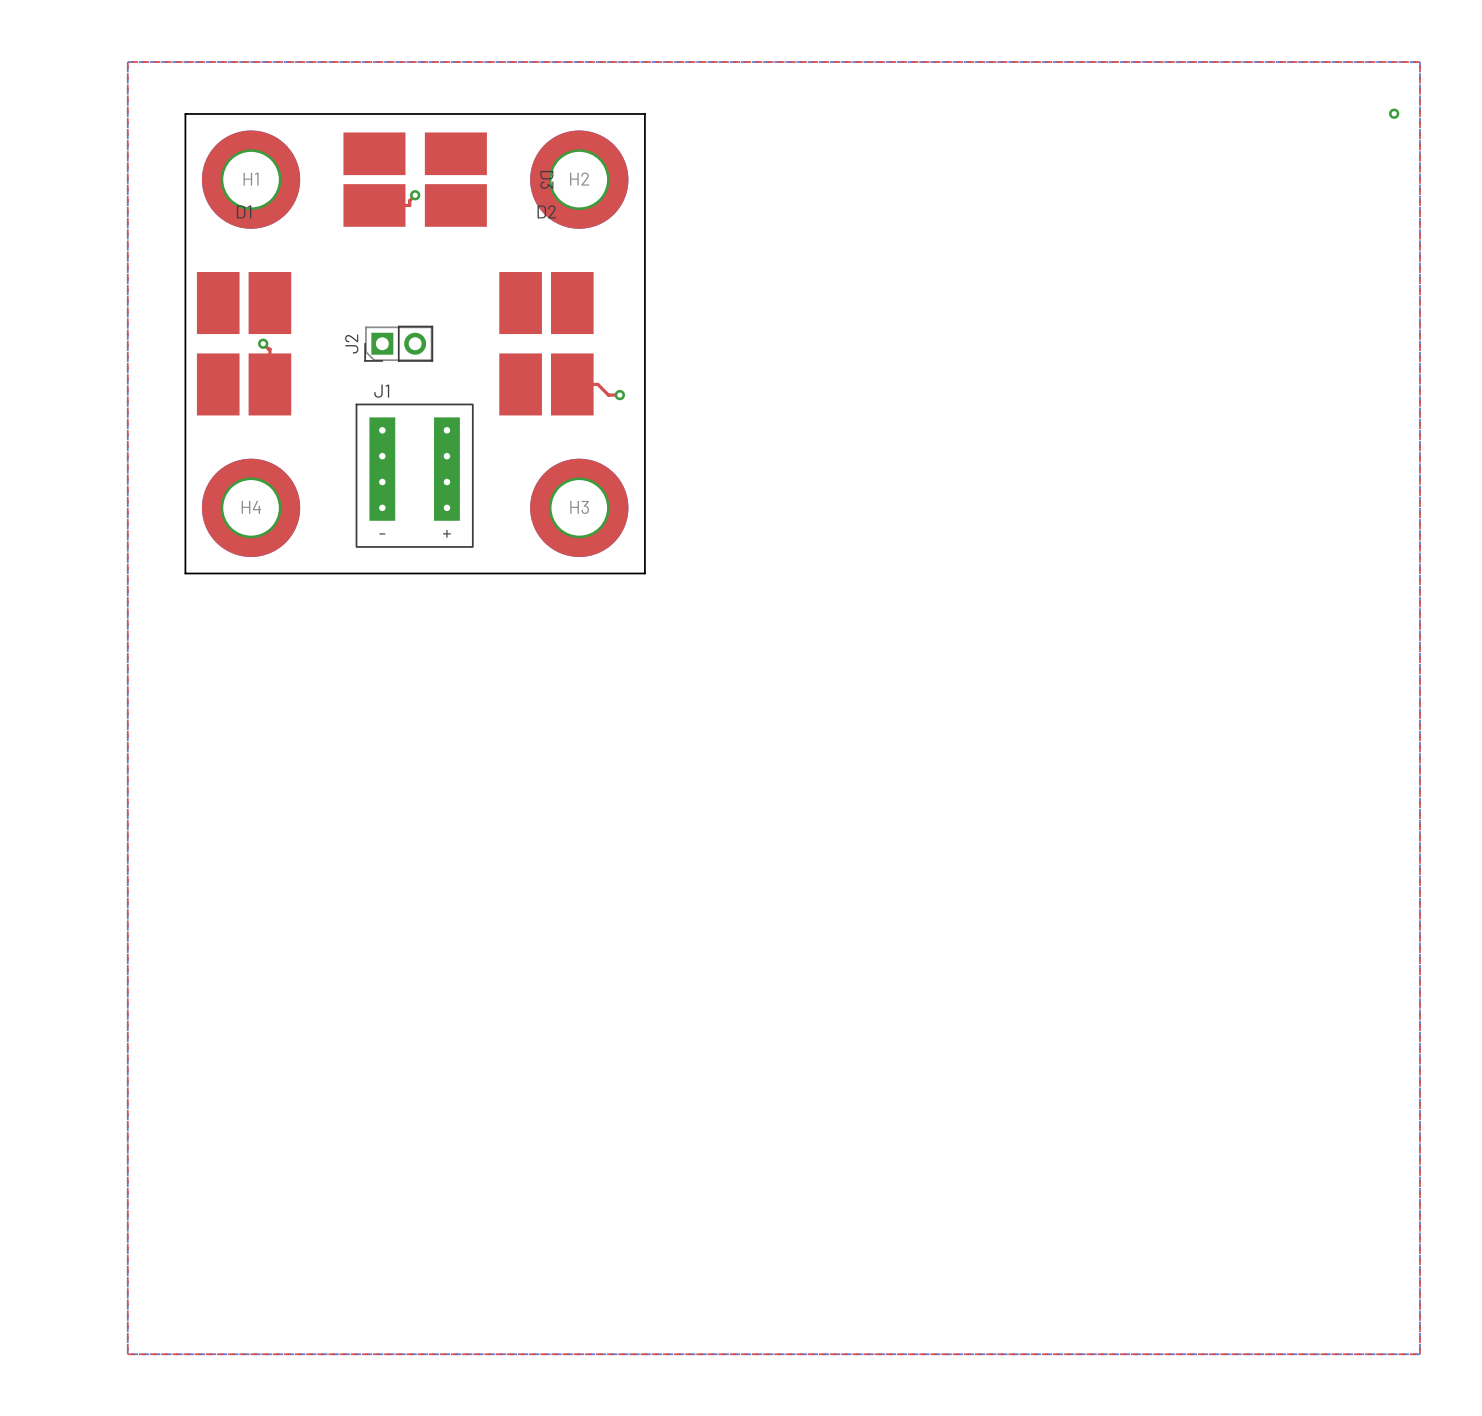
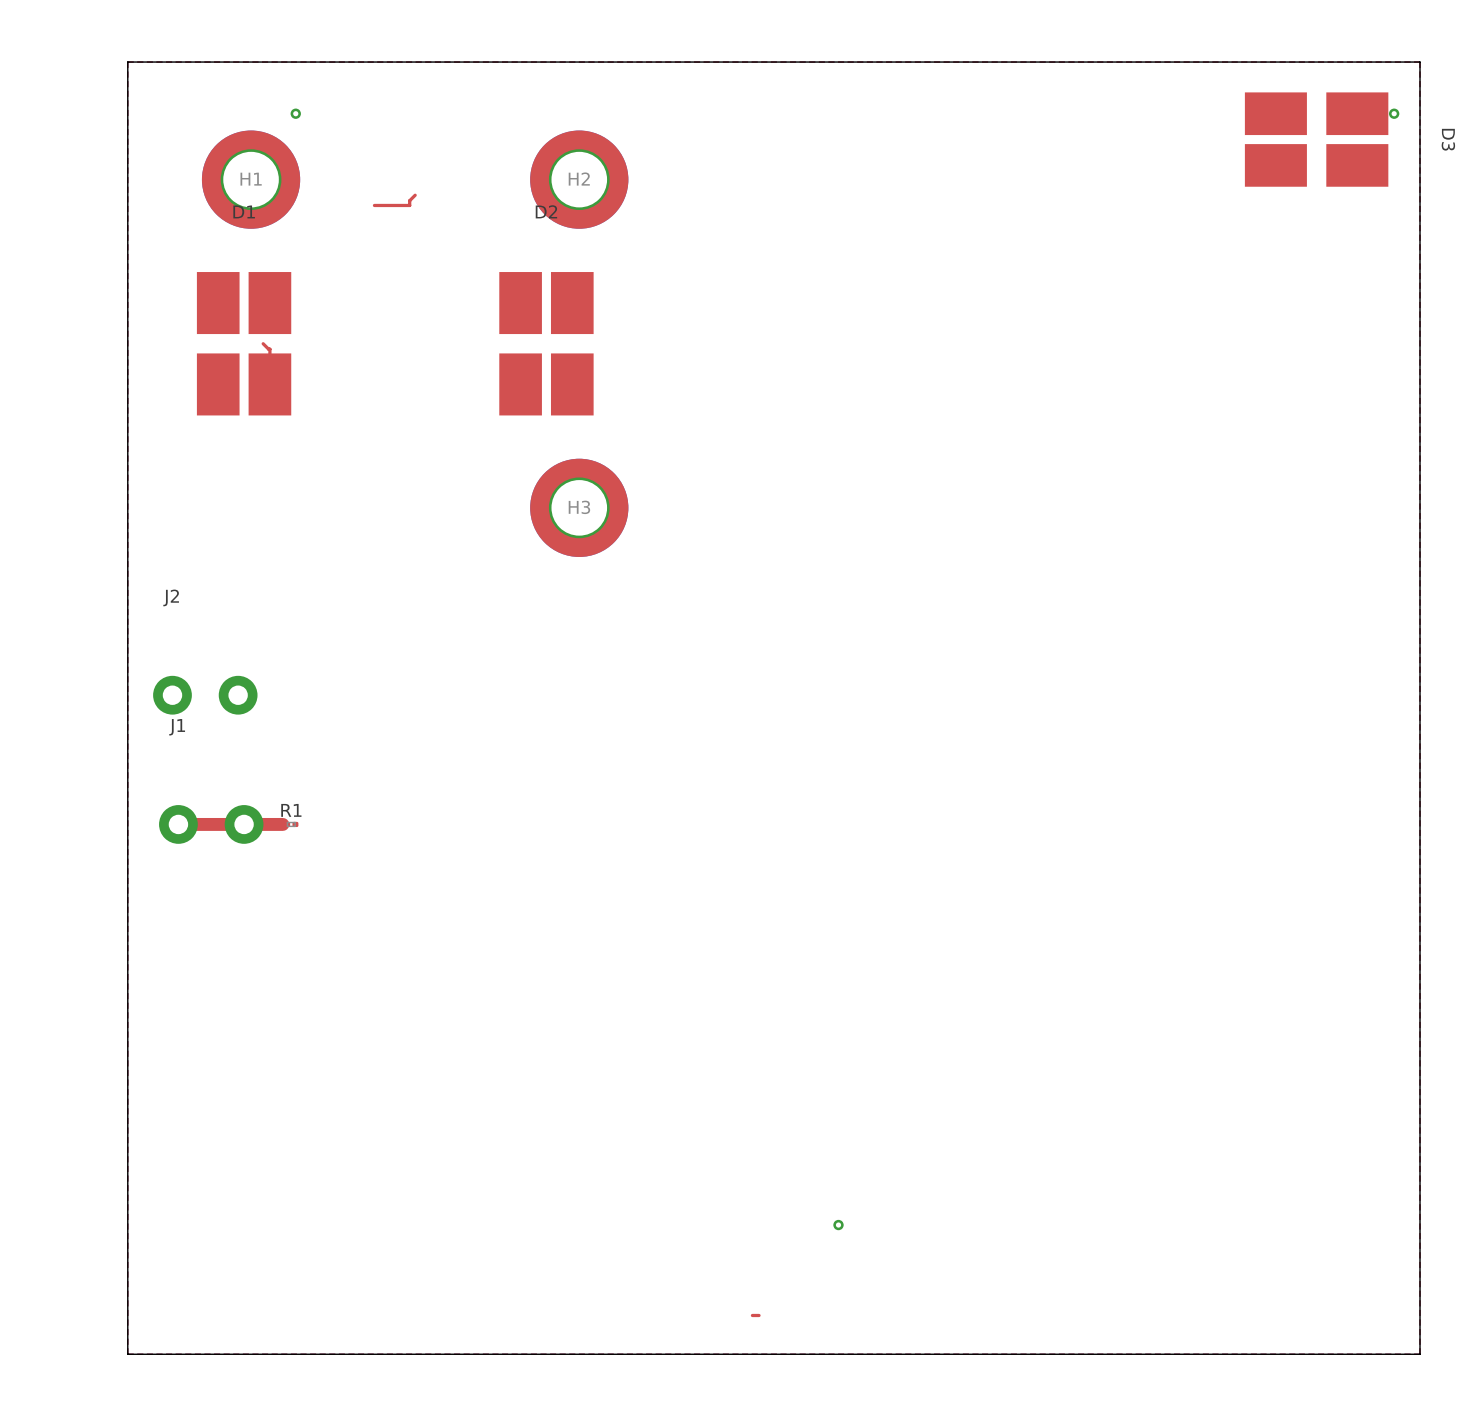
board edge: none -> (127, 62) (1419, 62) (1419, 1354) (127, 1354) (127, 62)
board edge: (185, 113) (644, 113) (644, 573) (185, 573) (185, 113) -> none
via: none -> (295, 113)
D3 position: (415, 179) -> (1316, 139)
via: (415, 195) -> none
J2 footprint: [364, 325, 434, 362] -> [153, 675, 258, 715]
via: (263, 343) -> none
J2 name position: J2 (351, 344) -> J2 (171, 597)
top track: (572, 384) (597, 384) (608, 395) (619, 395) -> none
via: (619, 395) -> none
J1 footprint: [355, 403, 474, 548] -> [159, 805, 264, 844]
H4: (251, 507) -> none
top track: none -> (178, 824) (282, 824)
R1: none -> (291, 824)
via: none -> (838, 1225)
top track: none -> (752, 1315) (759, 1315)

